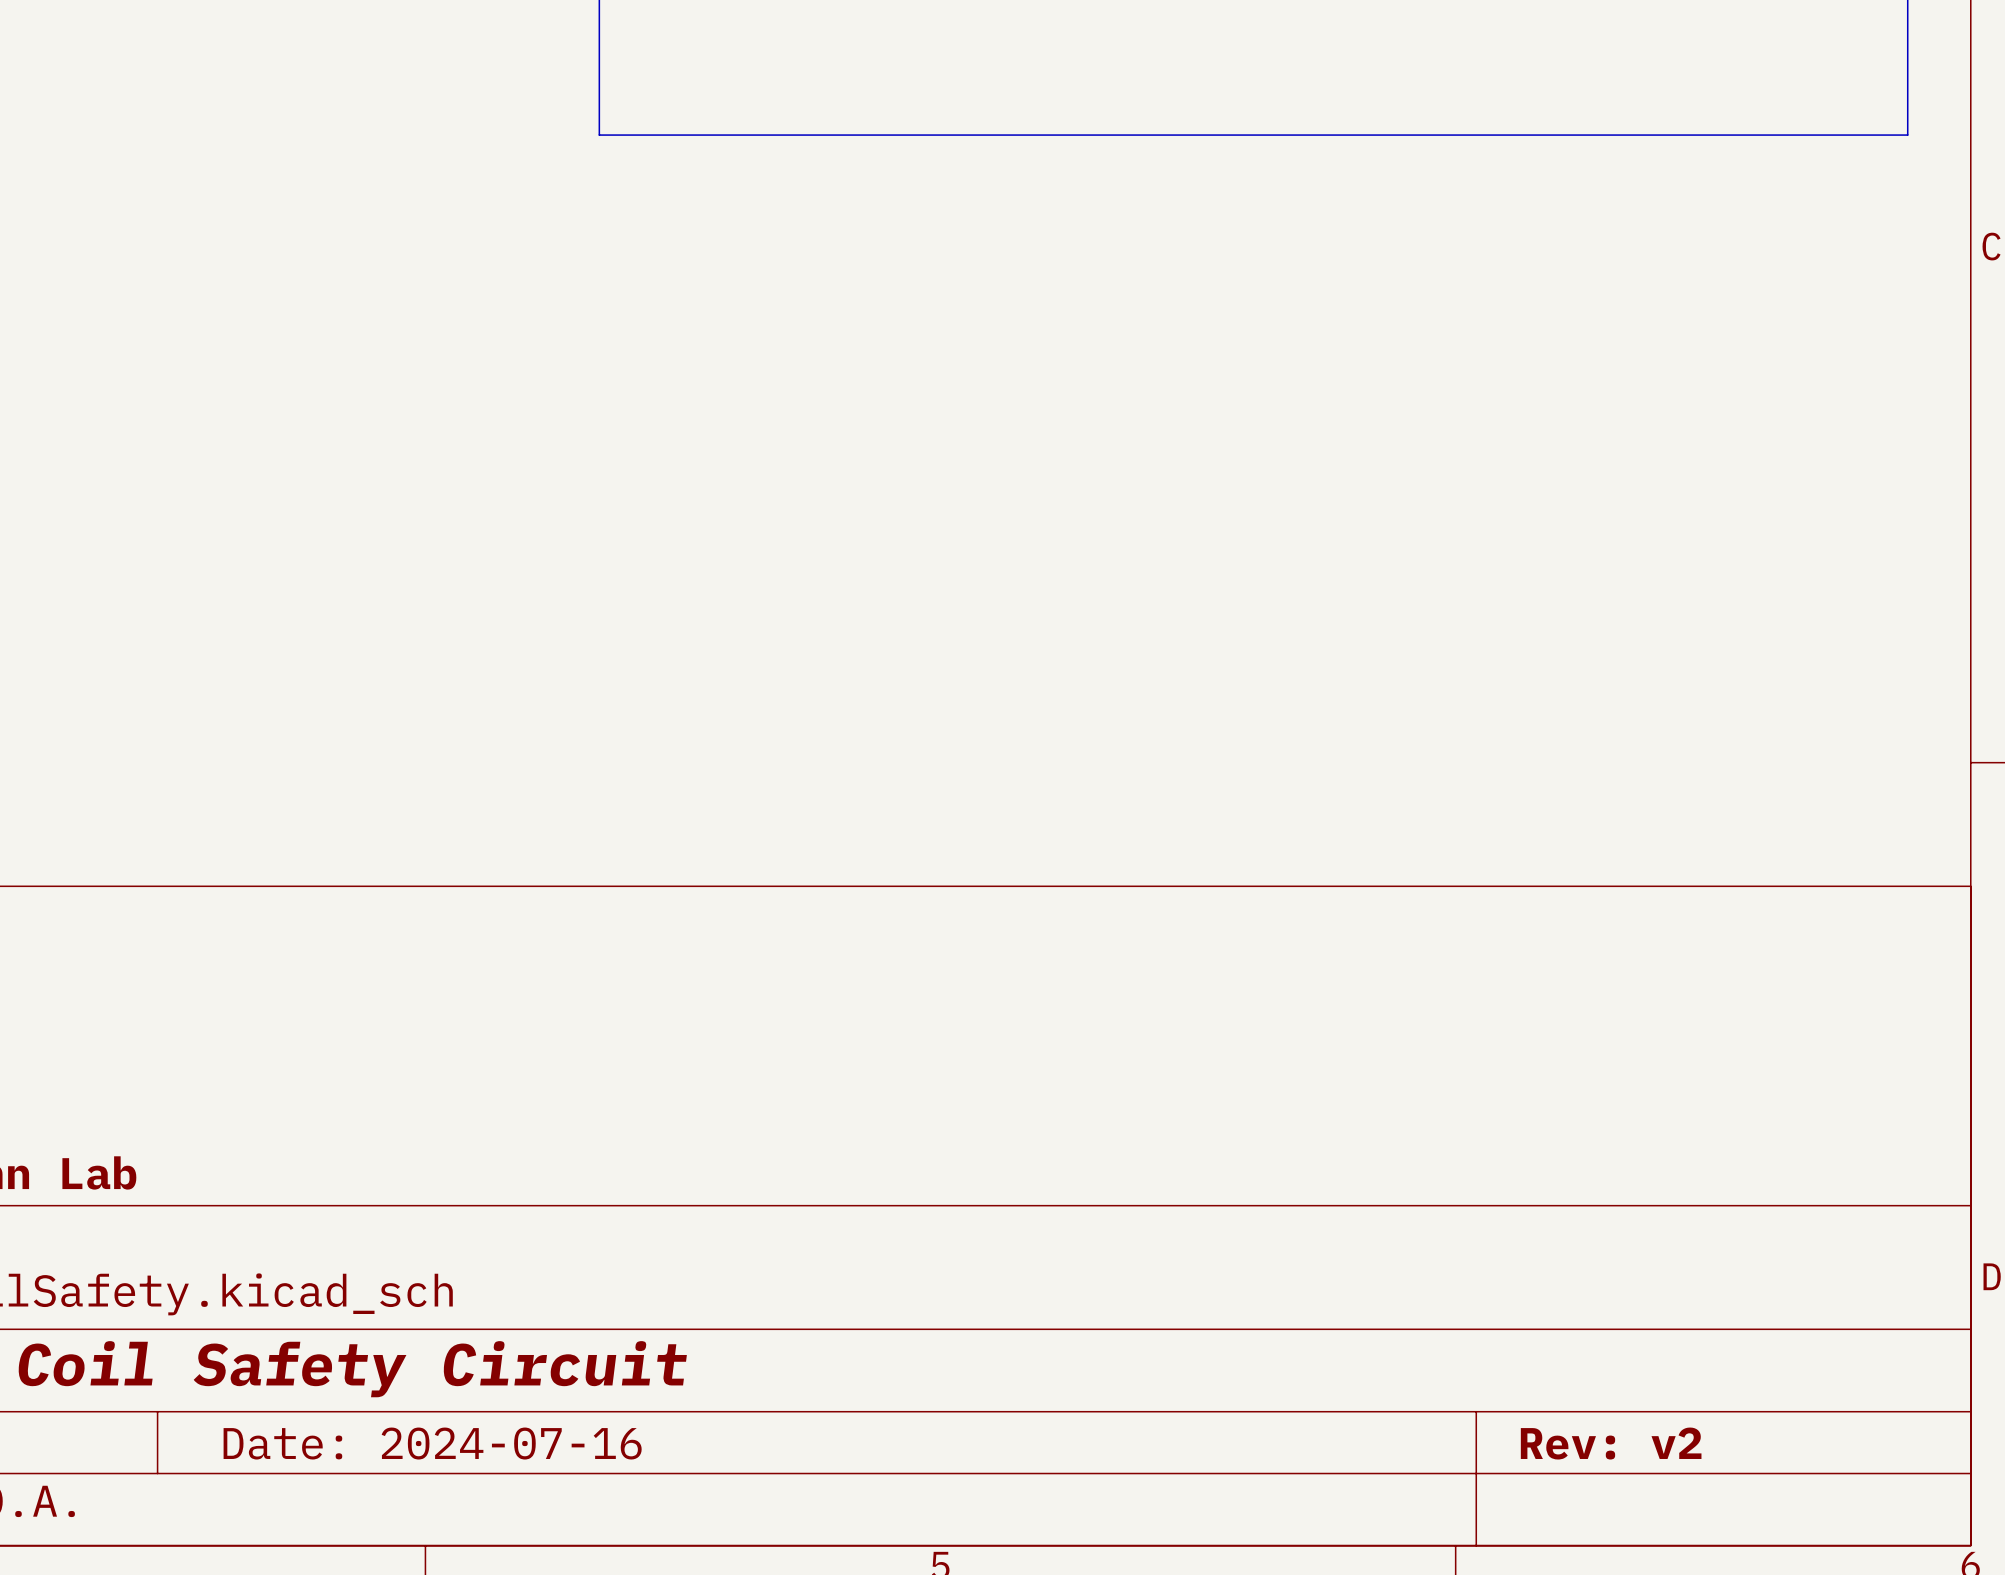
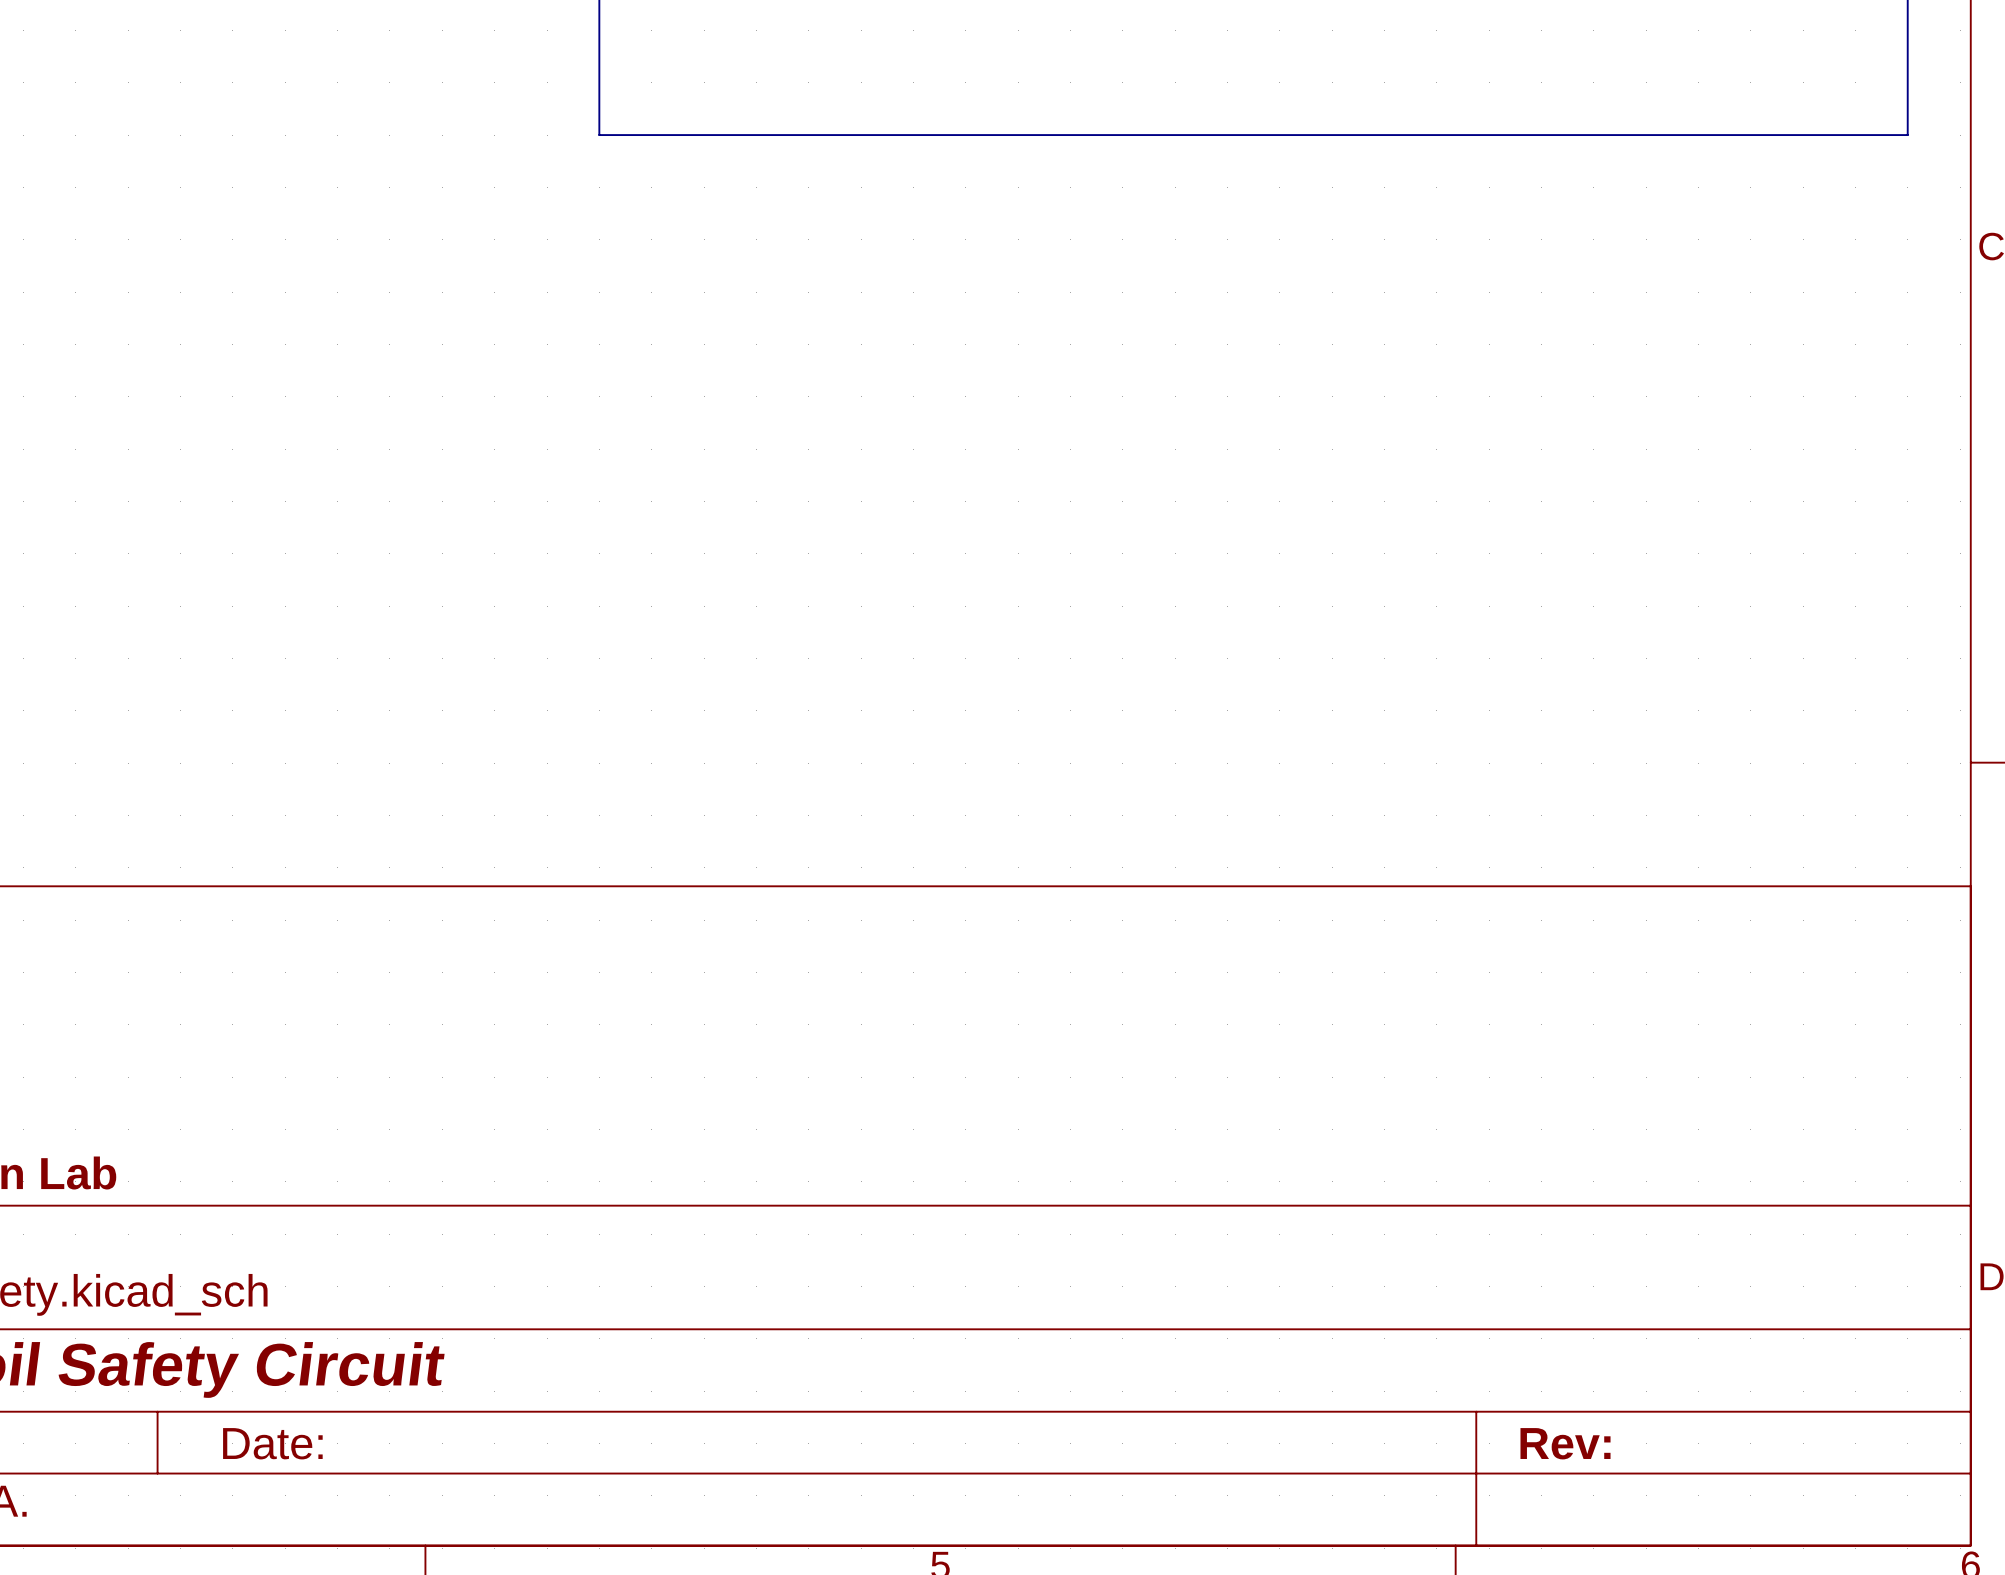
title block: Date: 2024-07-16 (432, 1443) -> Date: (272, 1443)
title block: Rev: v2 (1611, 1443) -> Rev: (1565, 1443)

